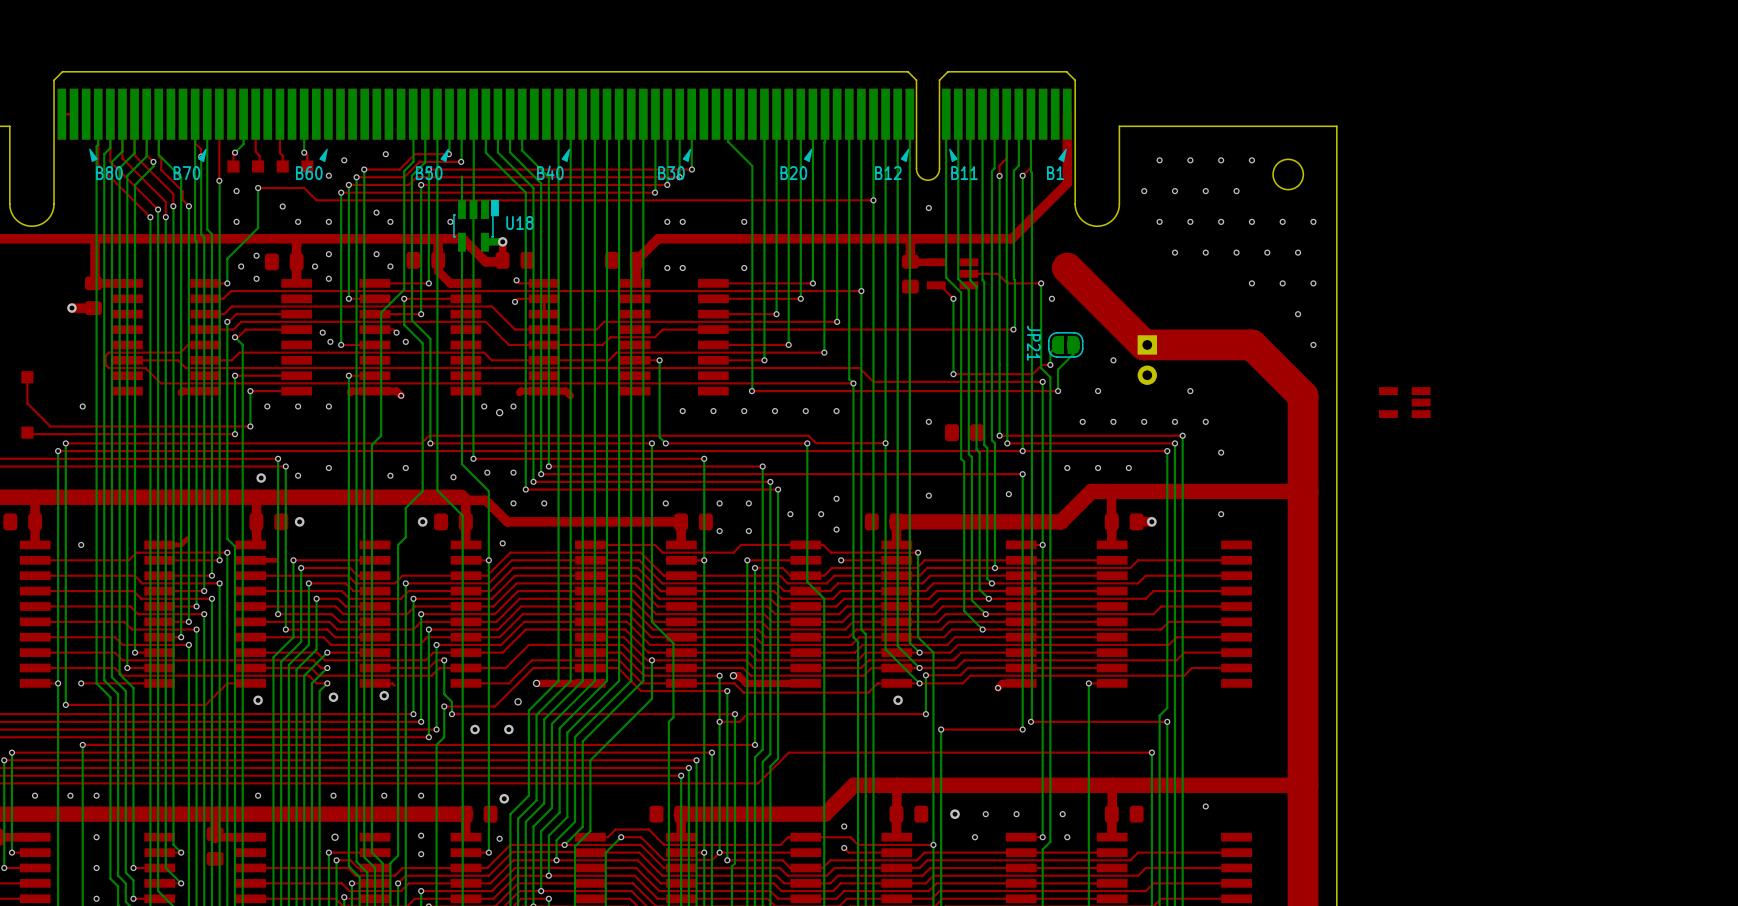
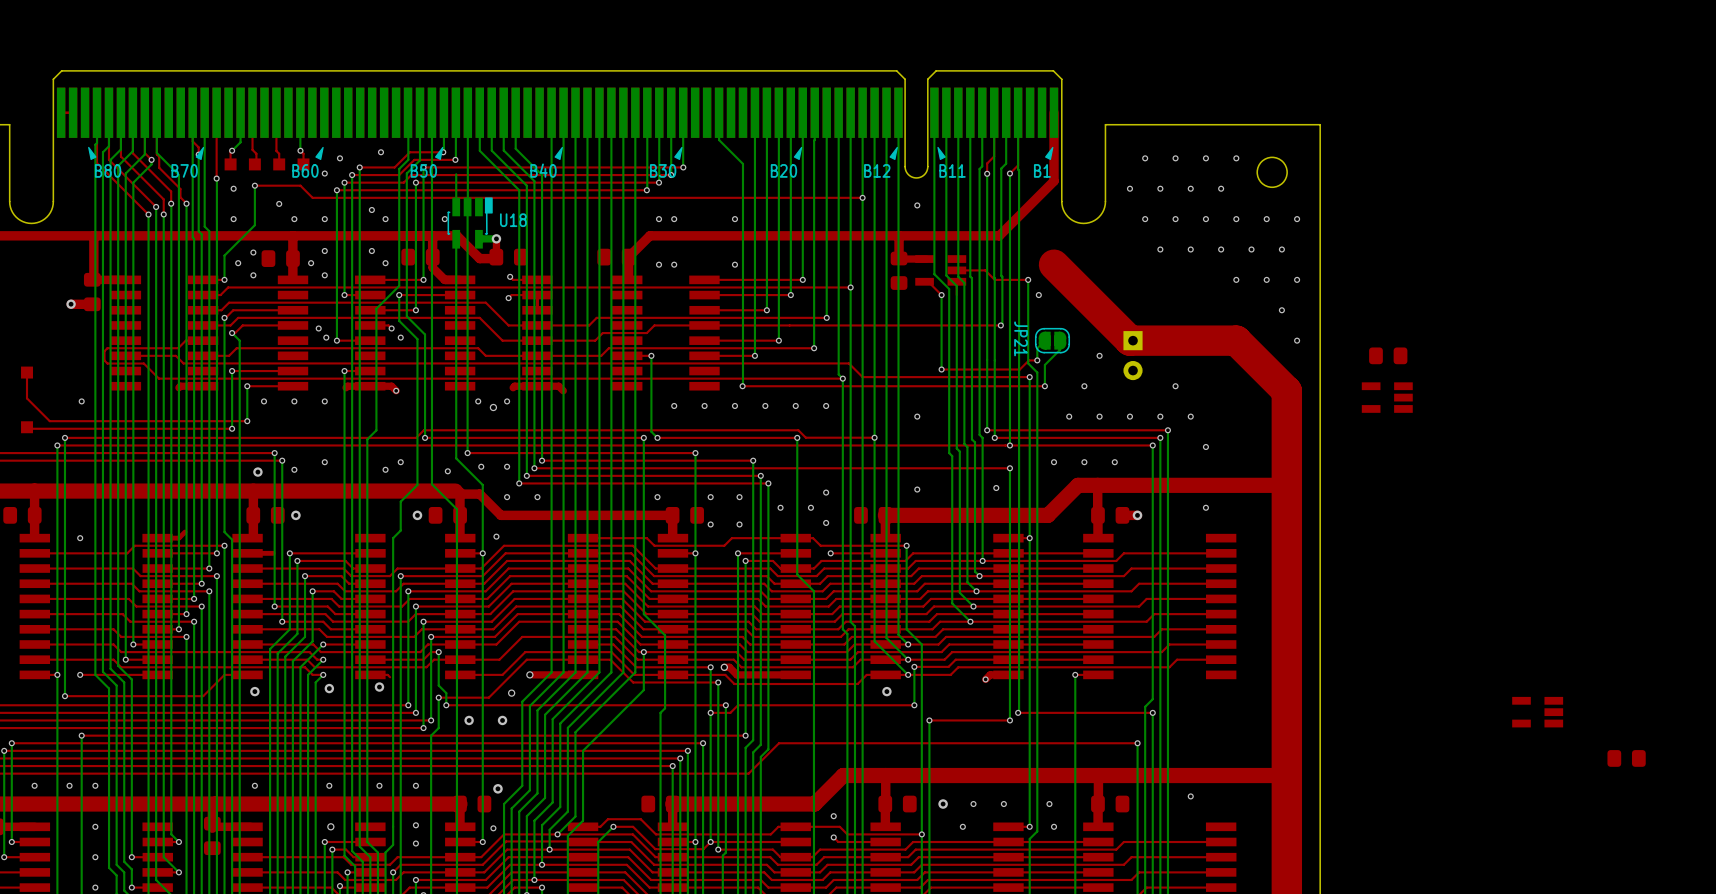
part: none -> (1388, 355)
part: (964, 432) -> none
part: none -> (1537, 712)
part: none -> (1626, 758)

